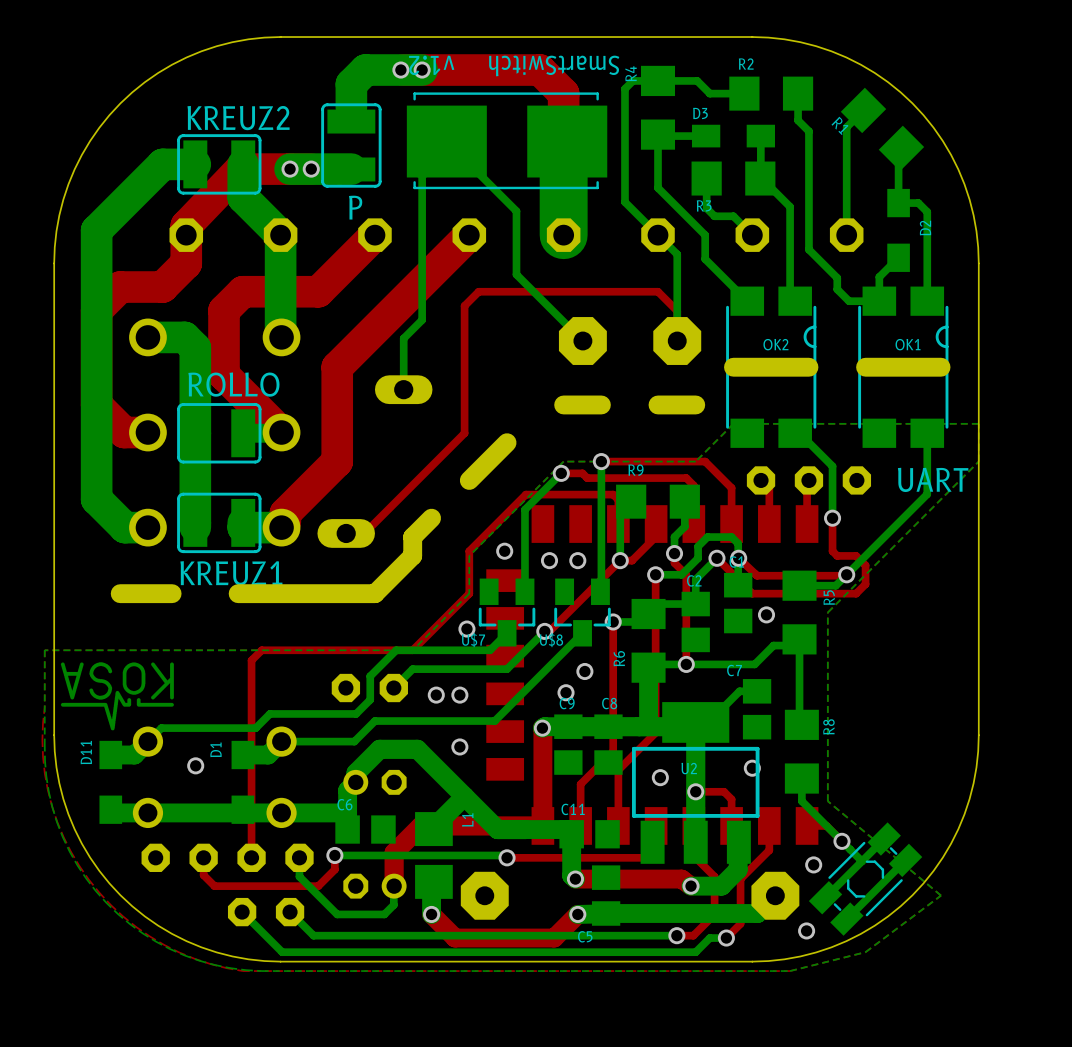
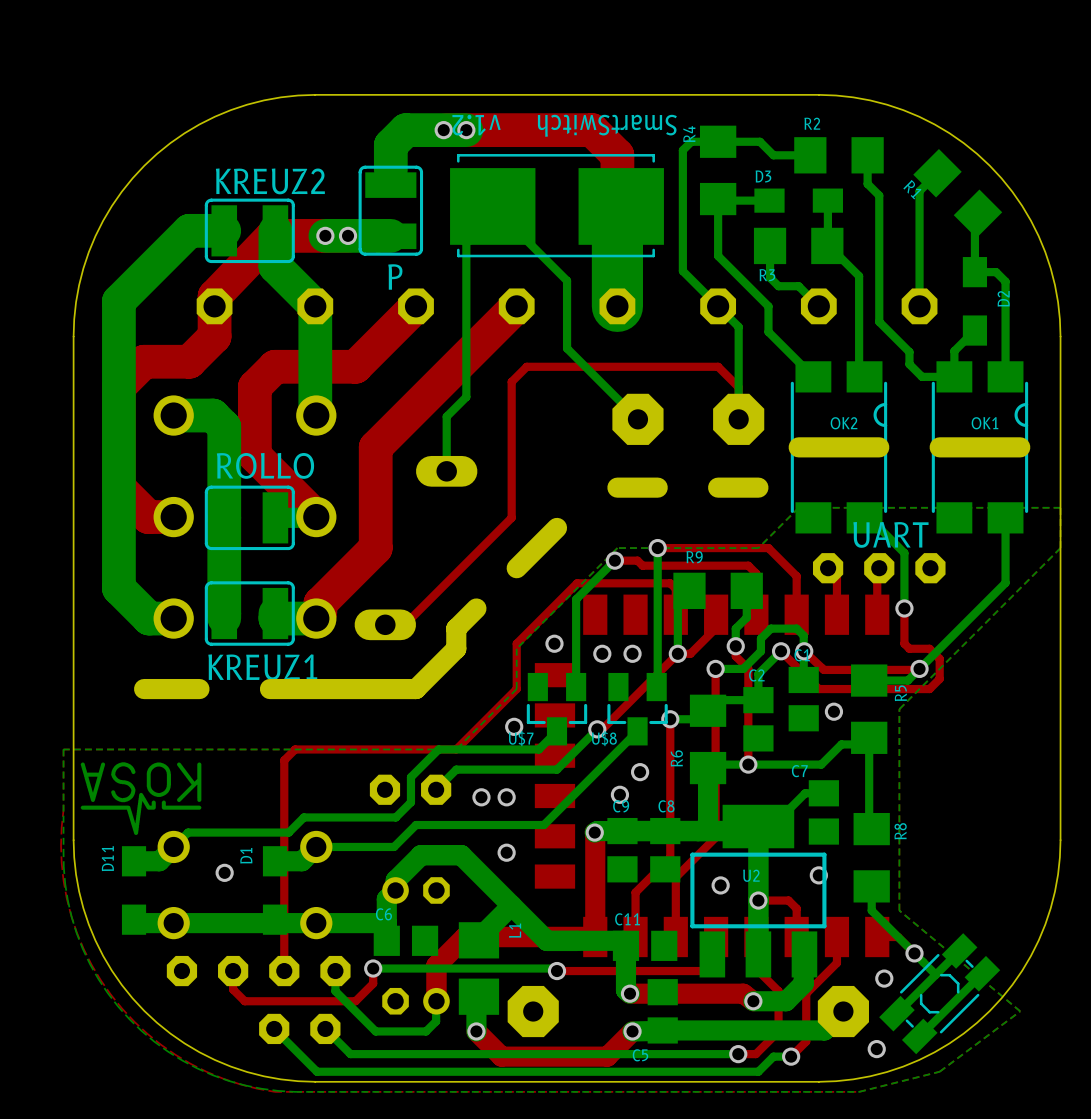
UART name position: UART (933, 479) -> UART (890, 534)

